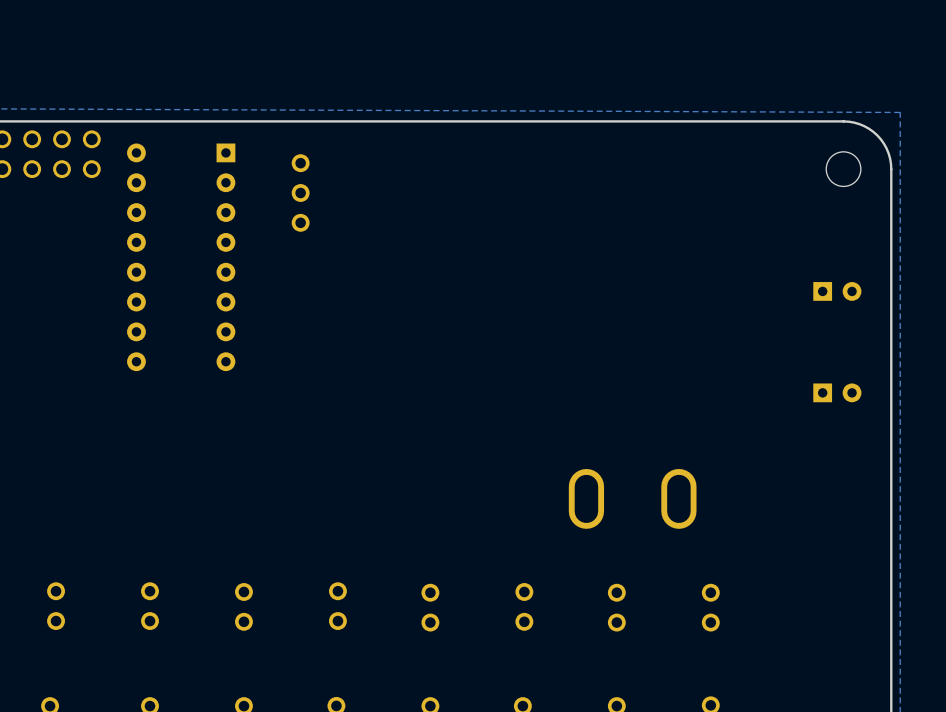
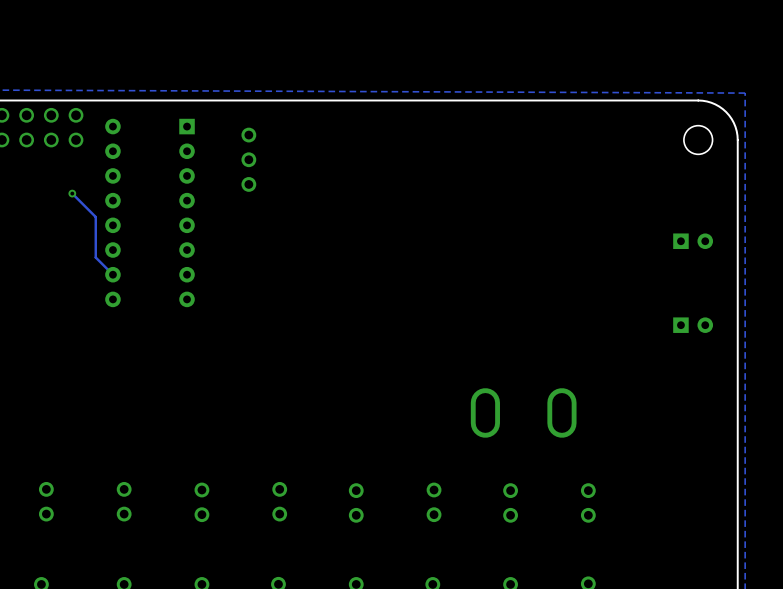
track: none -> (72, 193) (95, 217) (95, 257) (112, 274)
via: none -> (72, 193)

